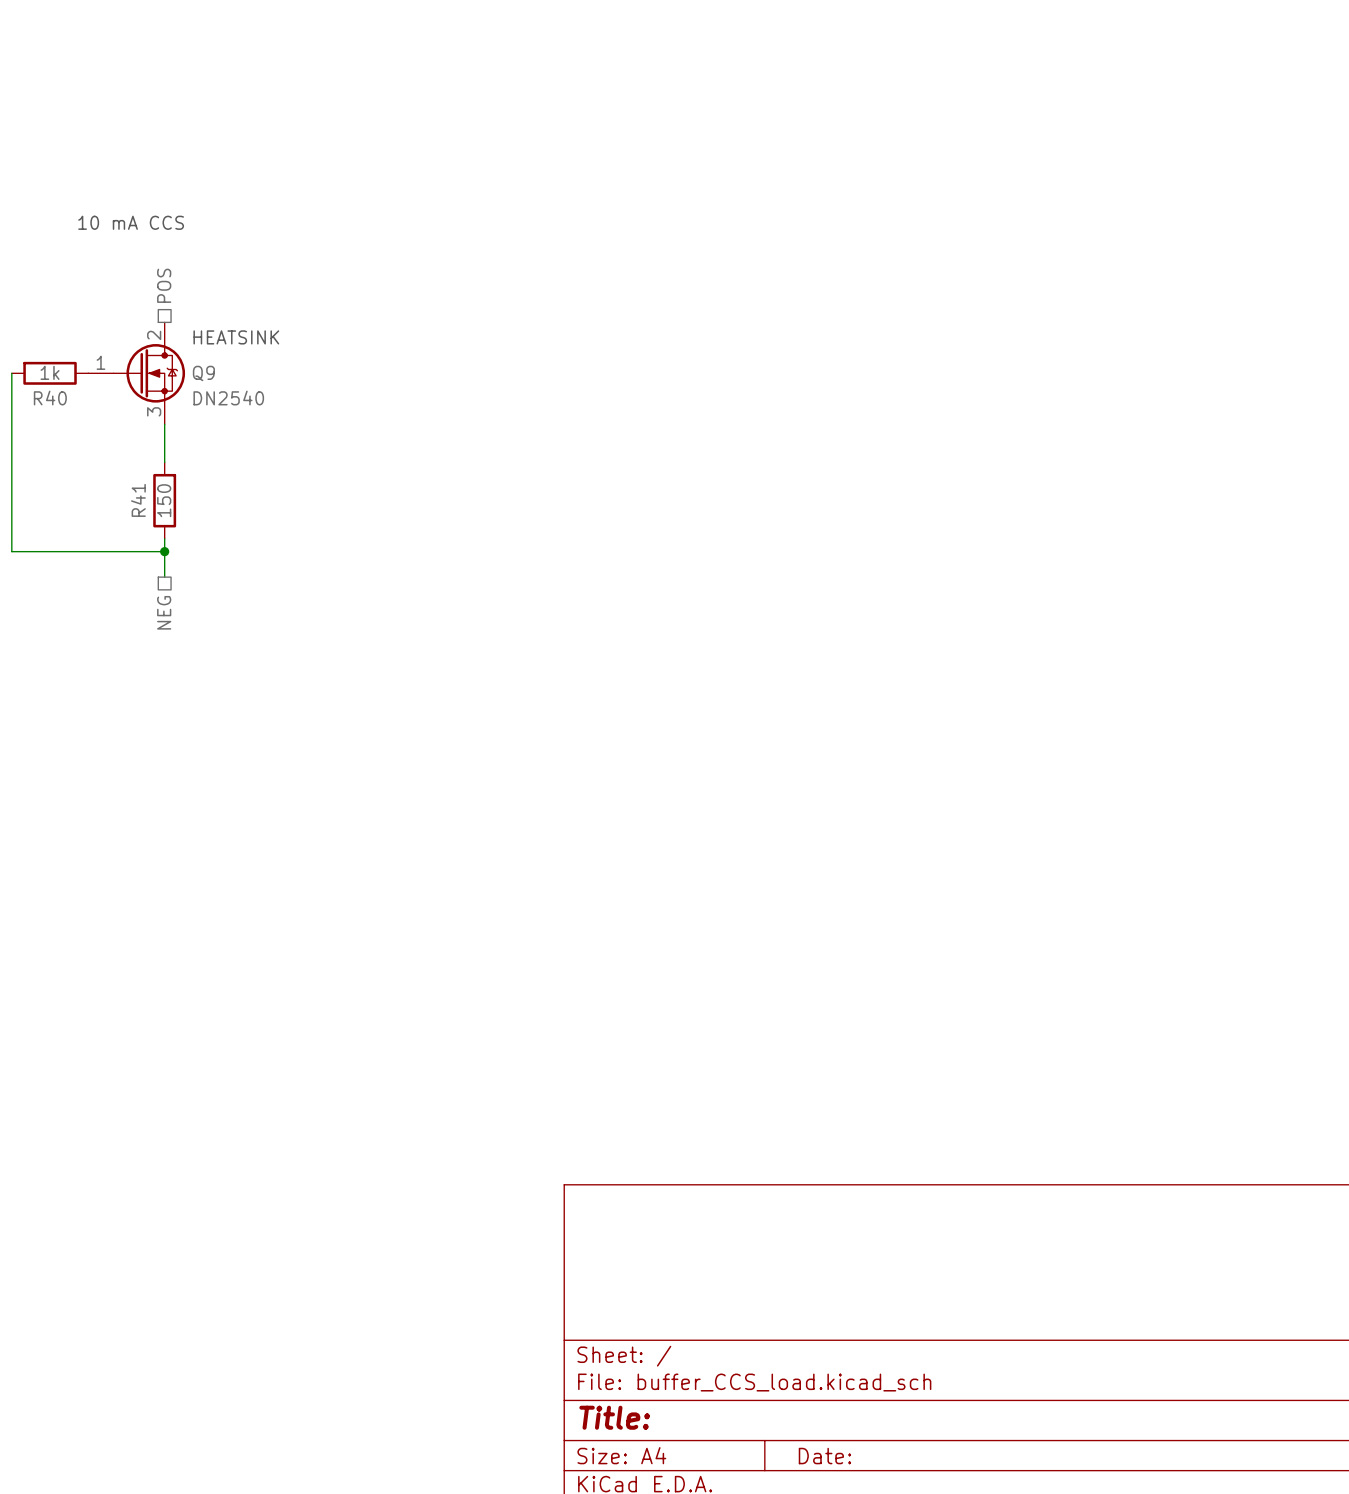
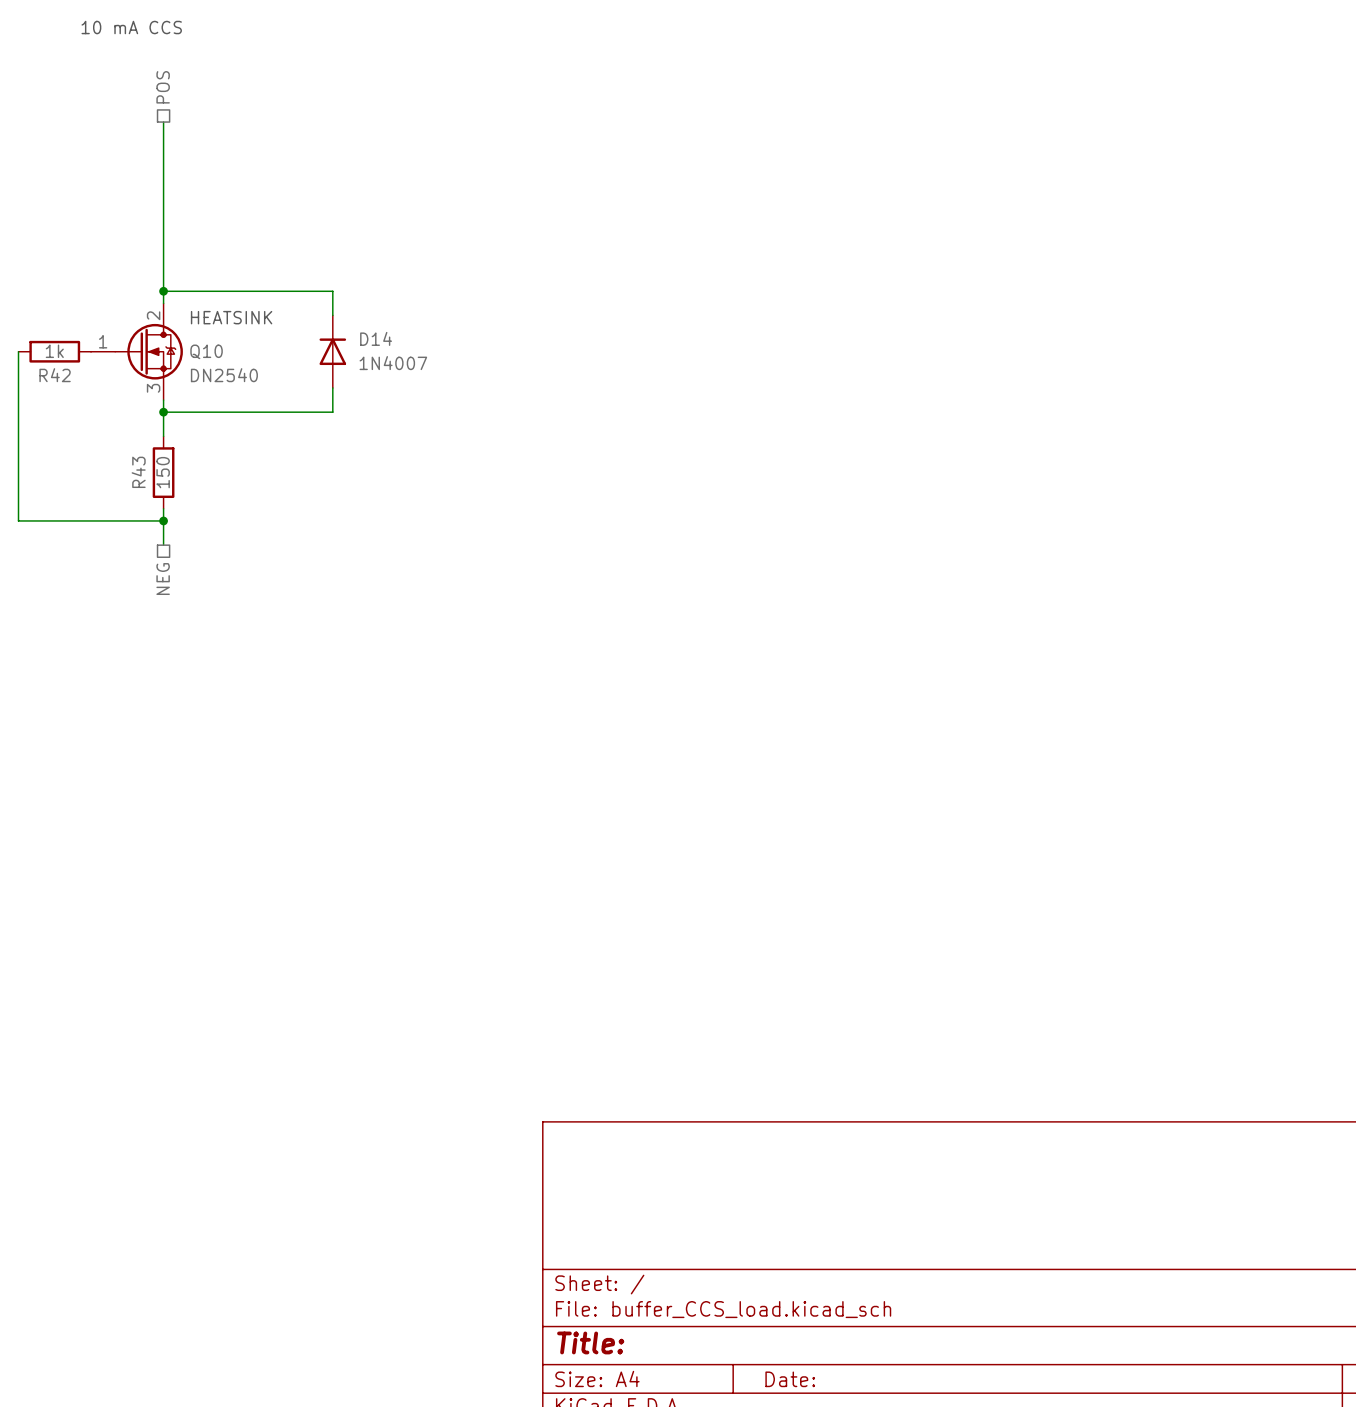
wire: none -> (163, 122) (163, 303)
text position: 10 mA CCS (131, 222) -> 10 mA CCS (131, 27)
hierarchical label position: POS (164, 285) -> POS (163, 87)
wire: none -> (163, 291) (332, 291) (332, 315)
junction: none -> (163, 291)
Q9 name: Q9 (203, 373) -> Q10 (206, 351)
D14: none -> 1N4007 (332, 351)
R40 name: R40 (50, 398) -> R42 (55, 375)
wire: none -> (332, 388) (332, 412) (163, 412)
junction: none -> (163, 412)
R41 name: R41 (138, 500) -> R43 (138, 472)

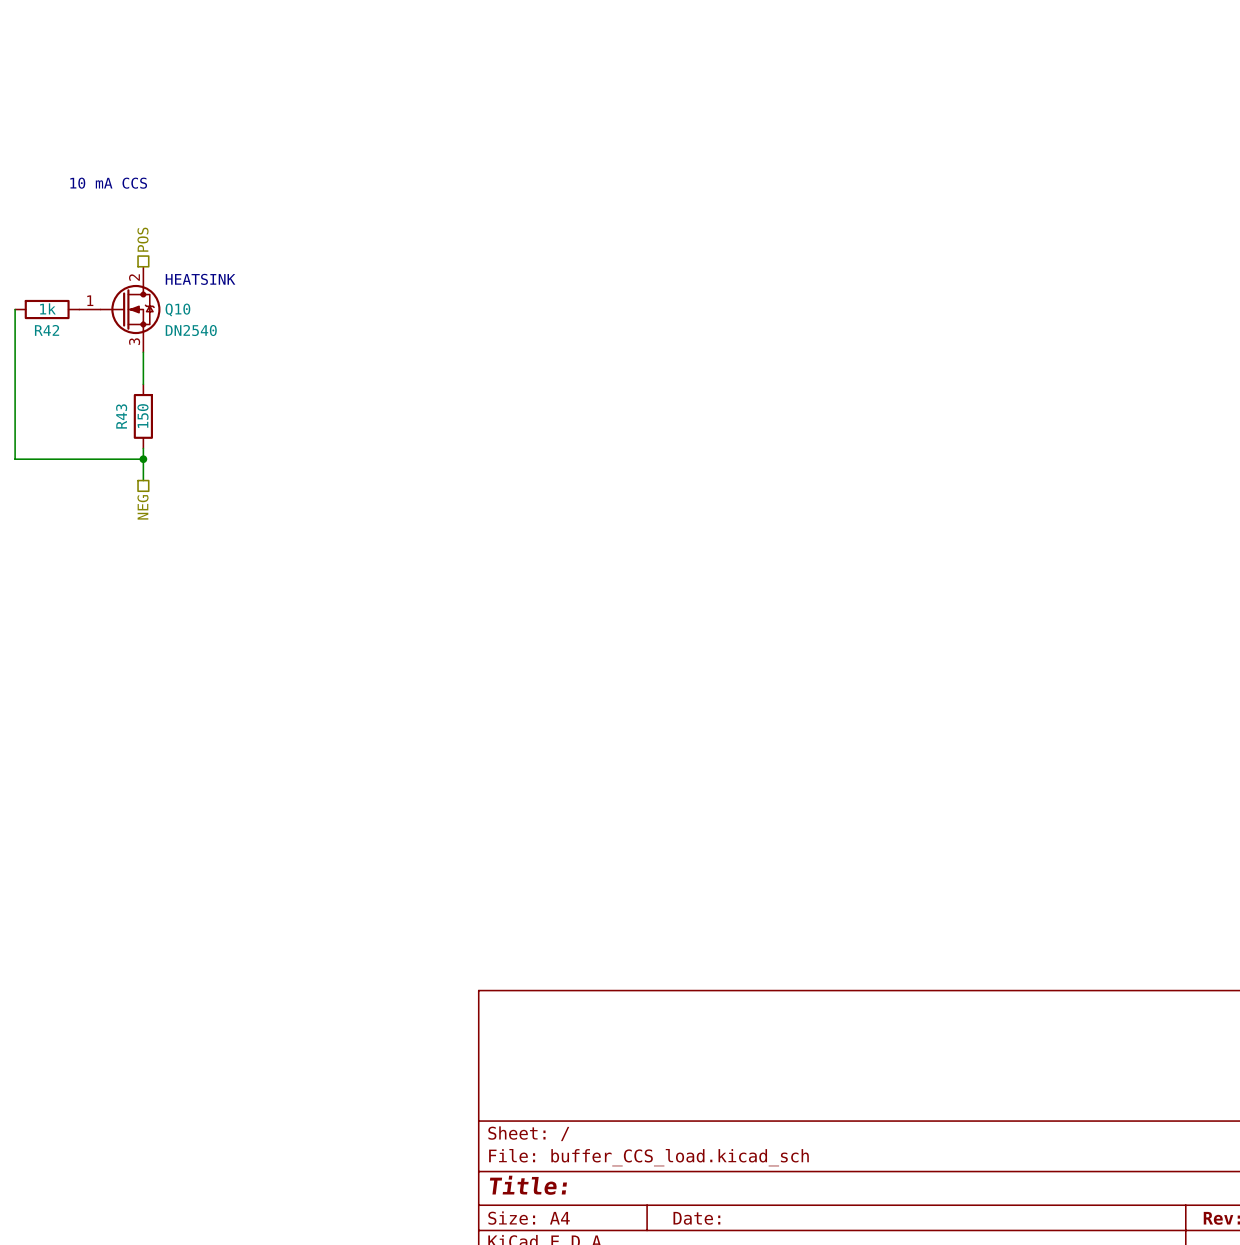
text position: 10 mA CCS (131, 27) -> 10 mA CCS (108, 183)
hierarchical label position: POS (163, 87) -> POS (142, 239)
wire: (163, 122) (163, 303) -> none
wire: (163, 291) (332, 291) (332, 315) -> none
junction: (163, 291) -> none
D14: 1N4007 (332, 351) -> none
wire: (332, 388) (332, 412) (163, 412) -> none
junction: (163, 412) -> none

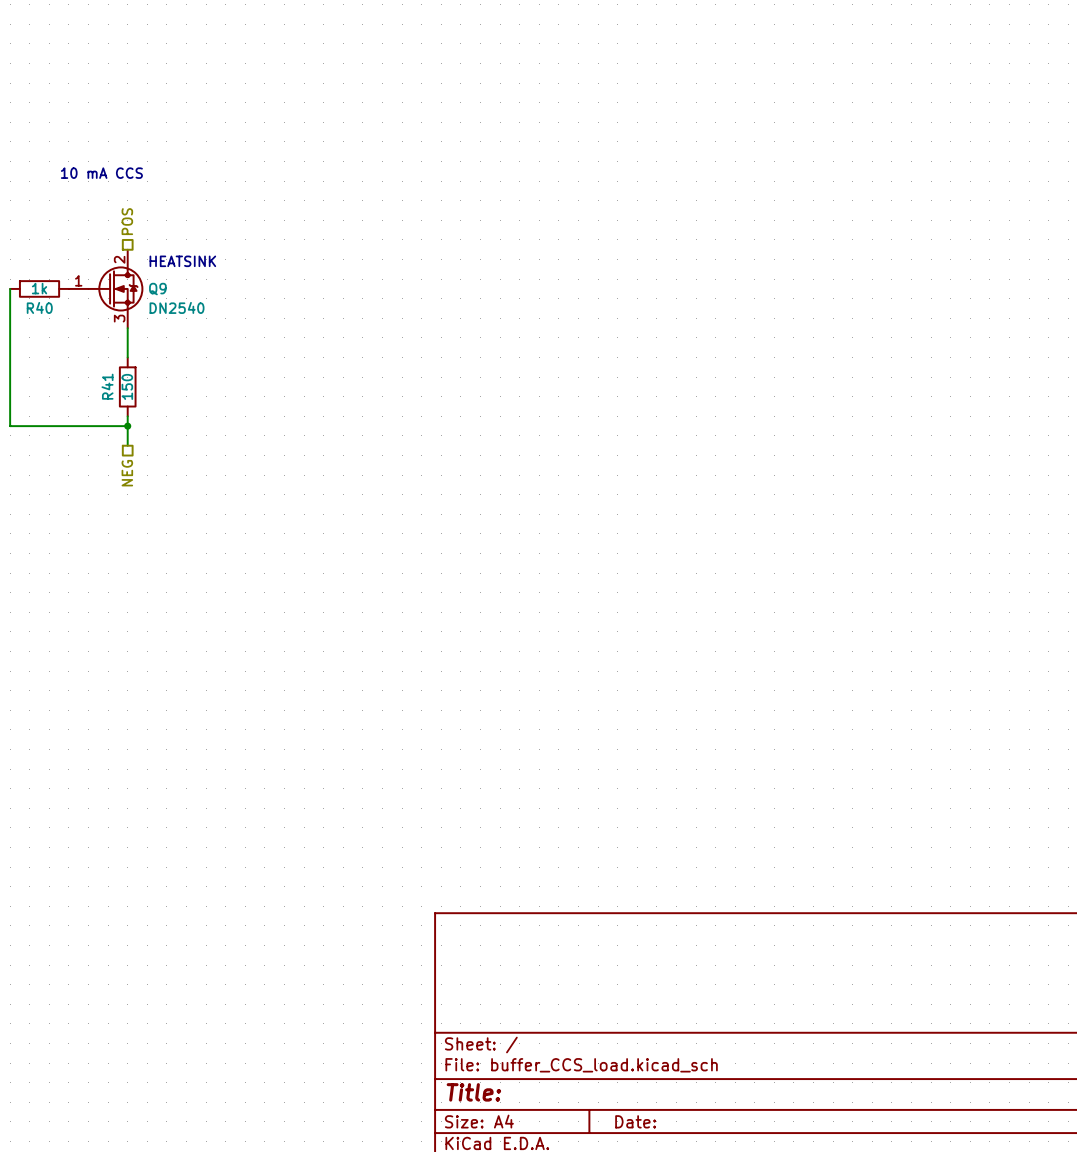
Q10 name: Q10 (177, 309) -> Q9 (157, 289)
R42 name: R42 (47, 330) -> R40 (39, 307)
R43 name: R43 (121, 416) -> R41 (107, 386)

